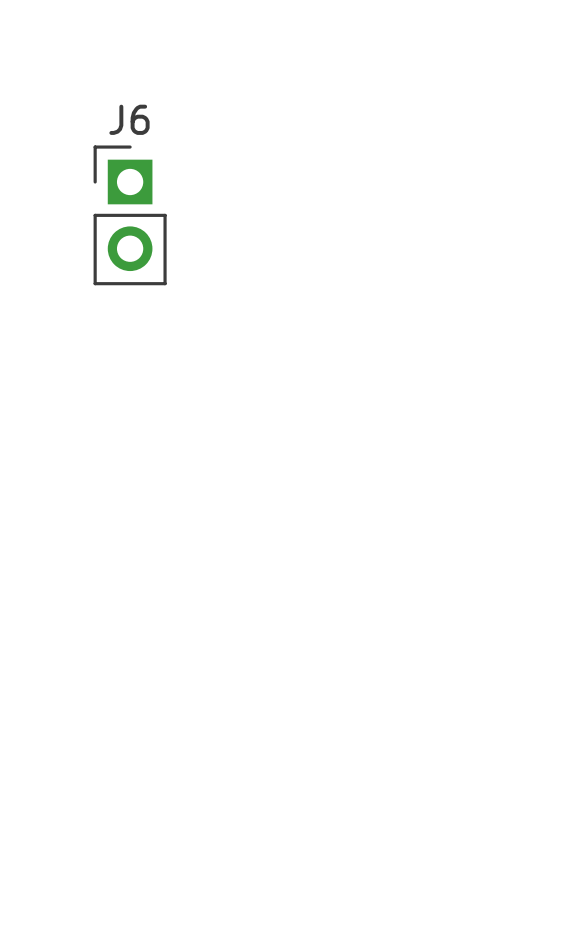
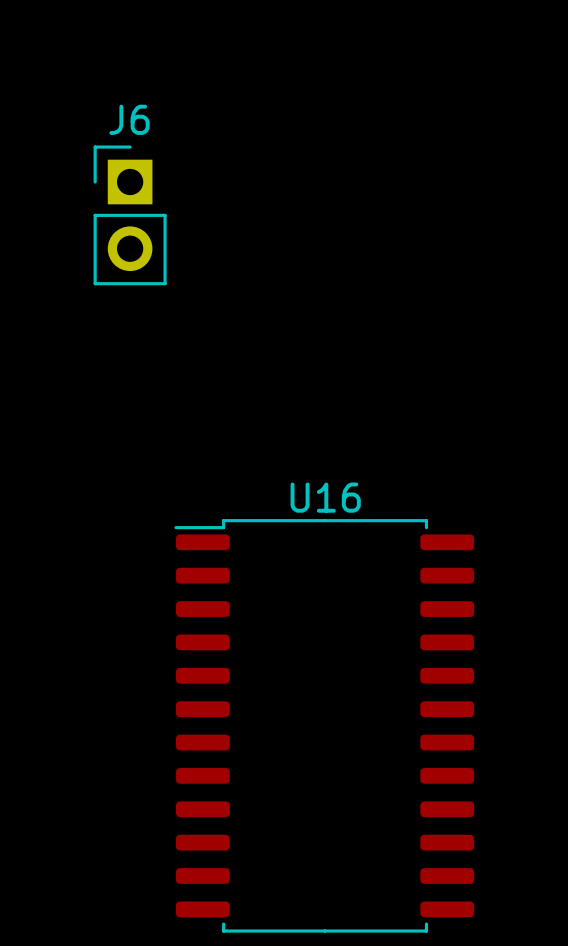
U16: none -> (324, 725)

